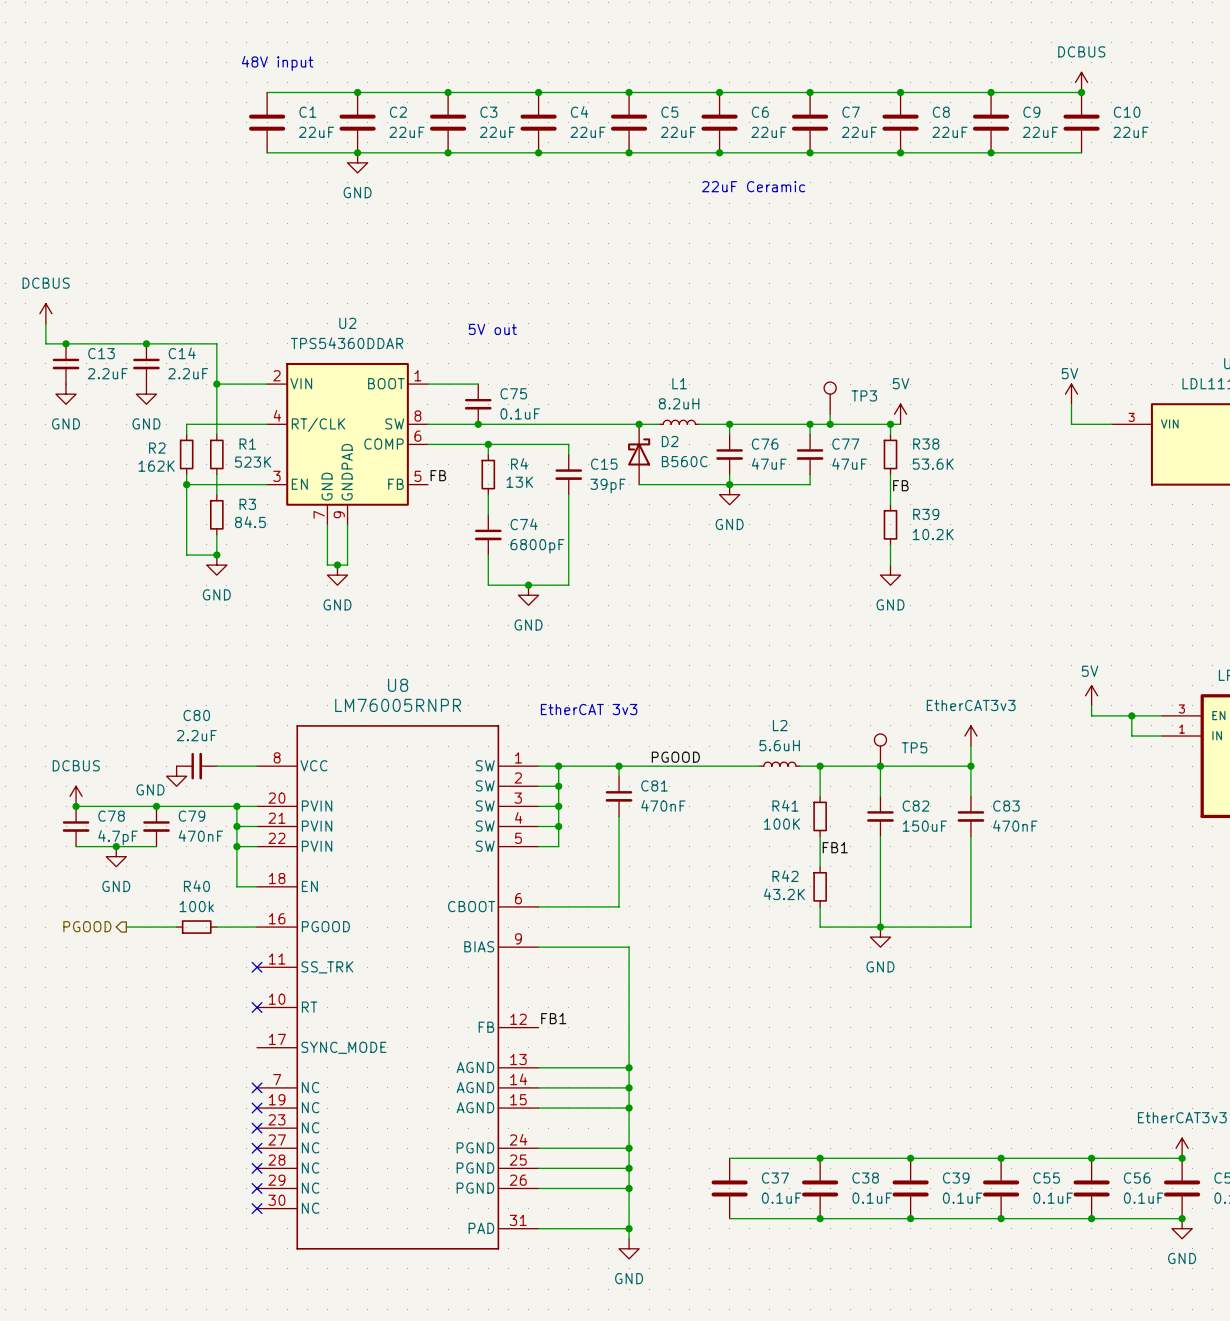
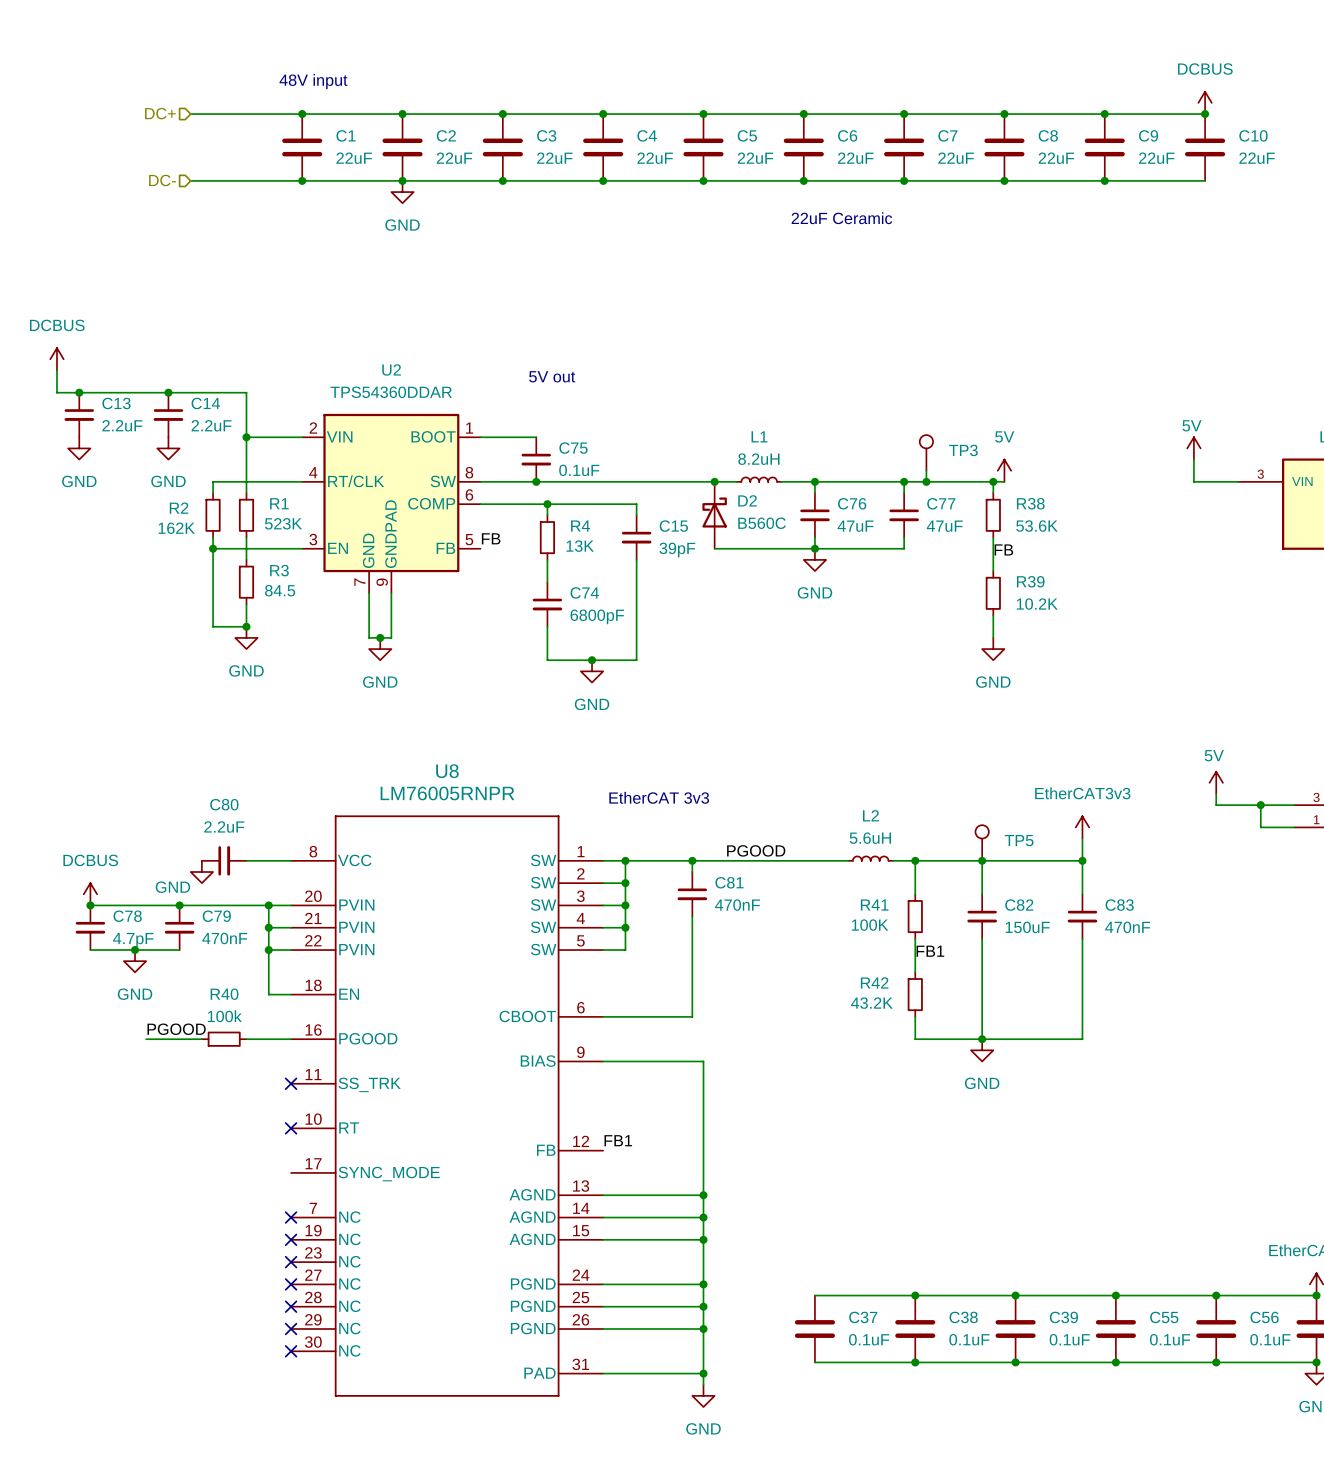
hierarchical label: none -> DC+ (160, 113)
wire: none -> (190, 114) (302, 114)
junction: none -> (302, 114)
hierarchical label: none -> DC- (162, 180)
wire: none -> (190, 180) (302, 180)
junction: none -> (302, 180)
label: none -> PGOOD (176, 1029)
hierarchical label: PGOOD (87, 926) -> none

